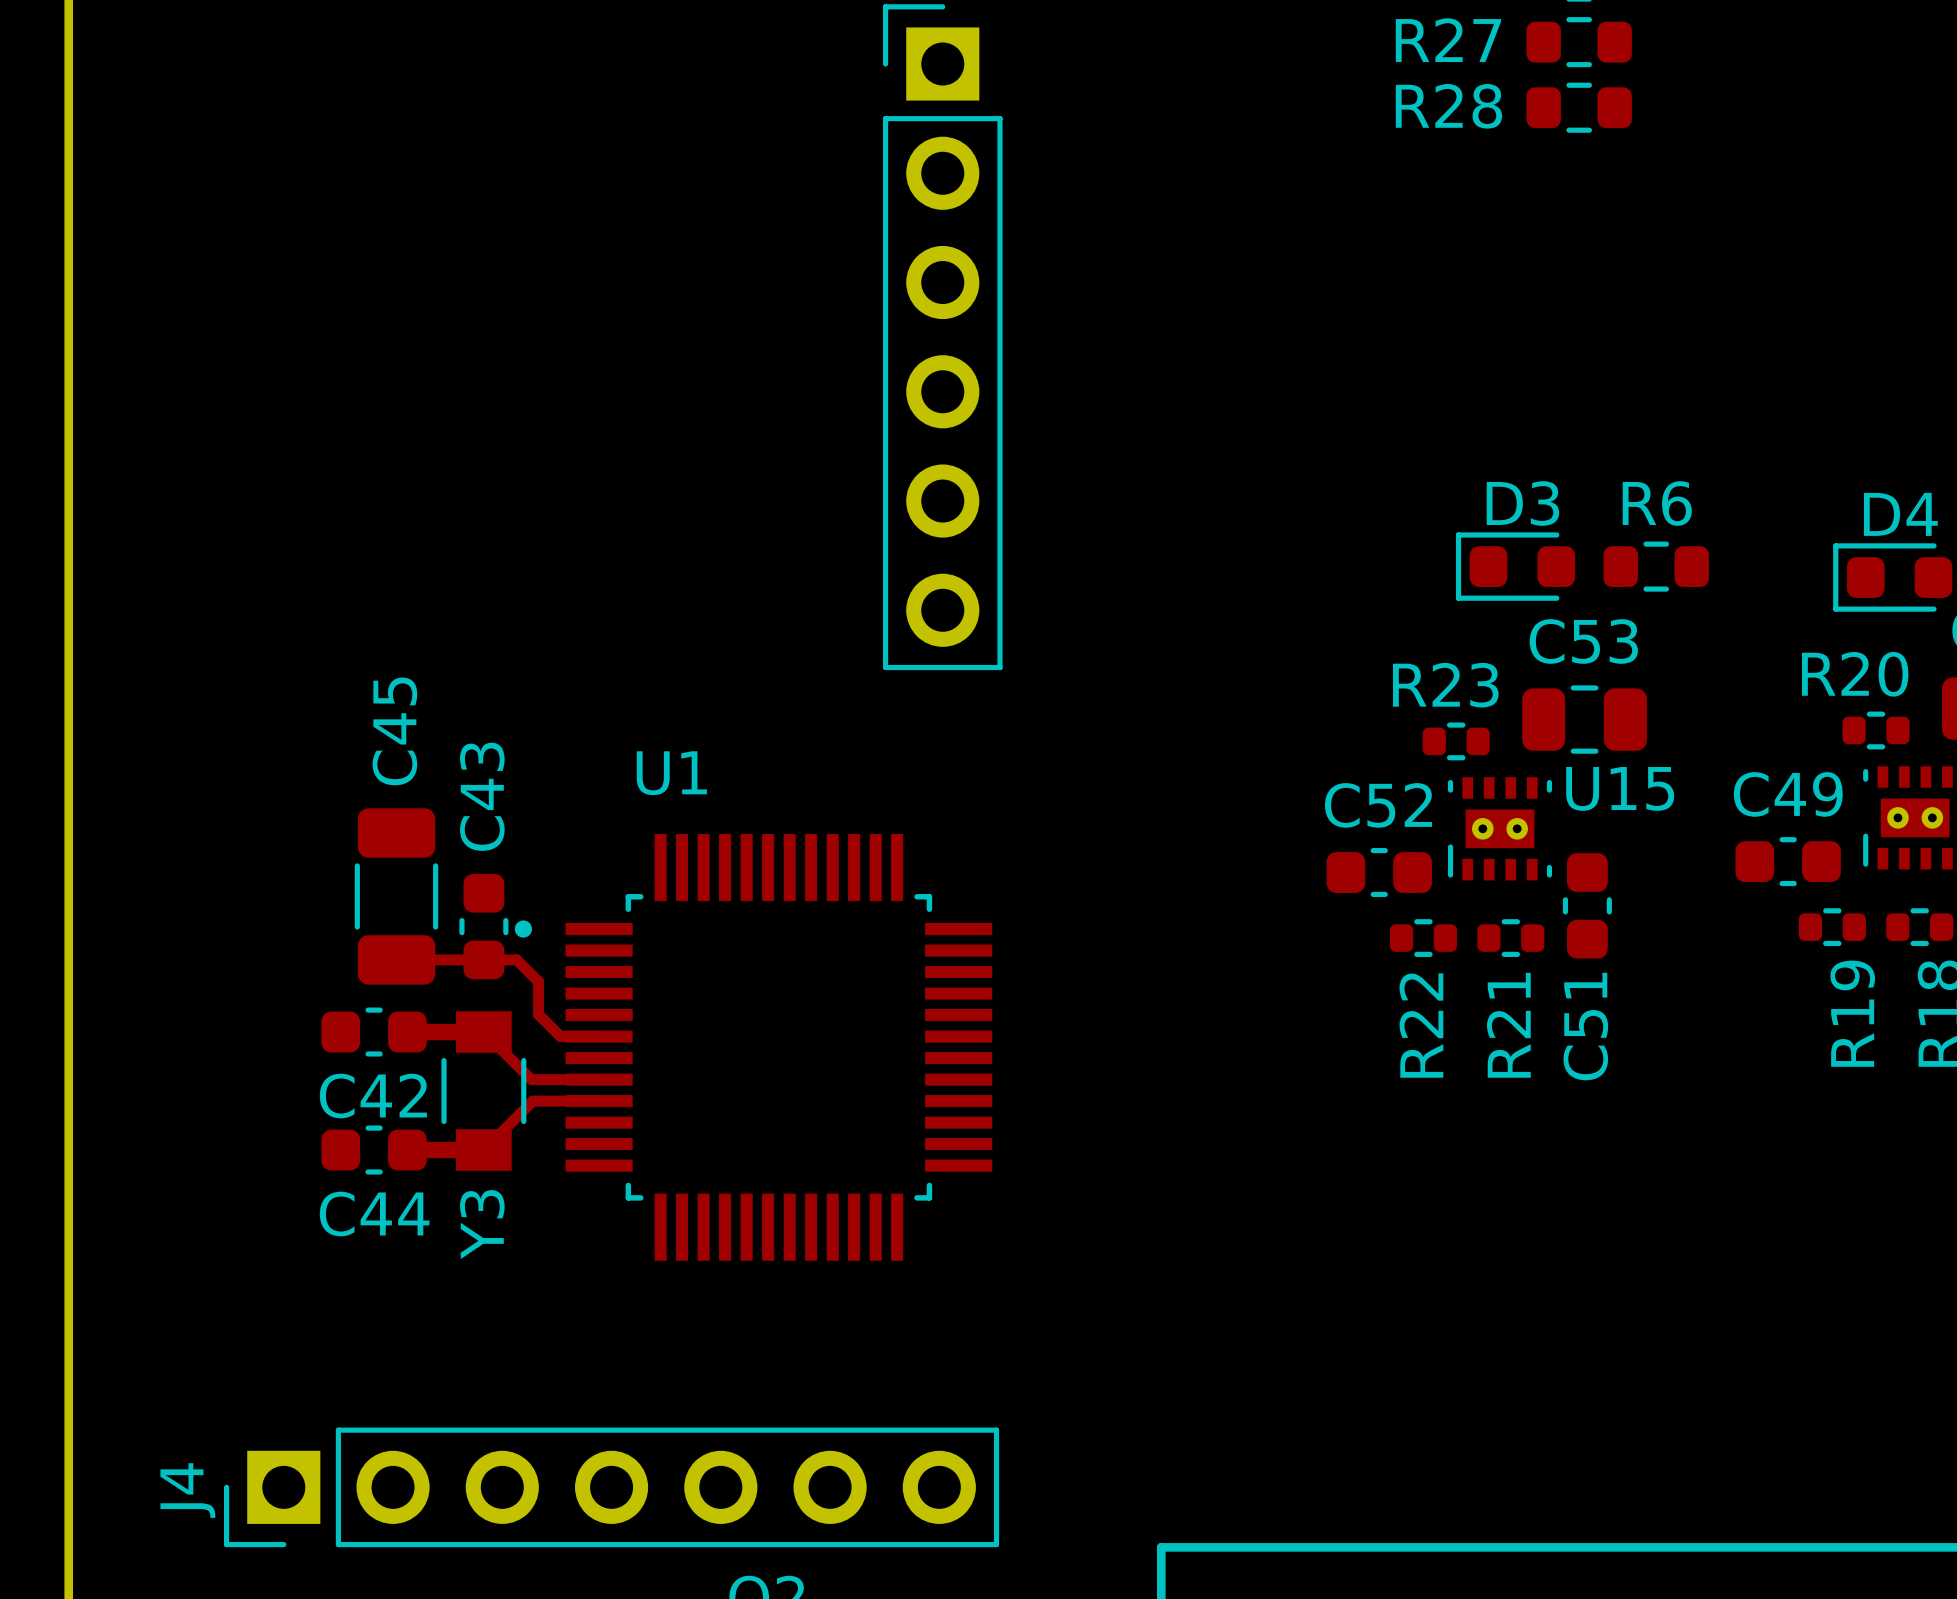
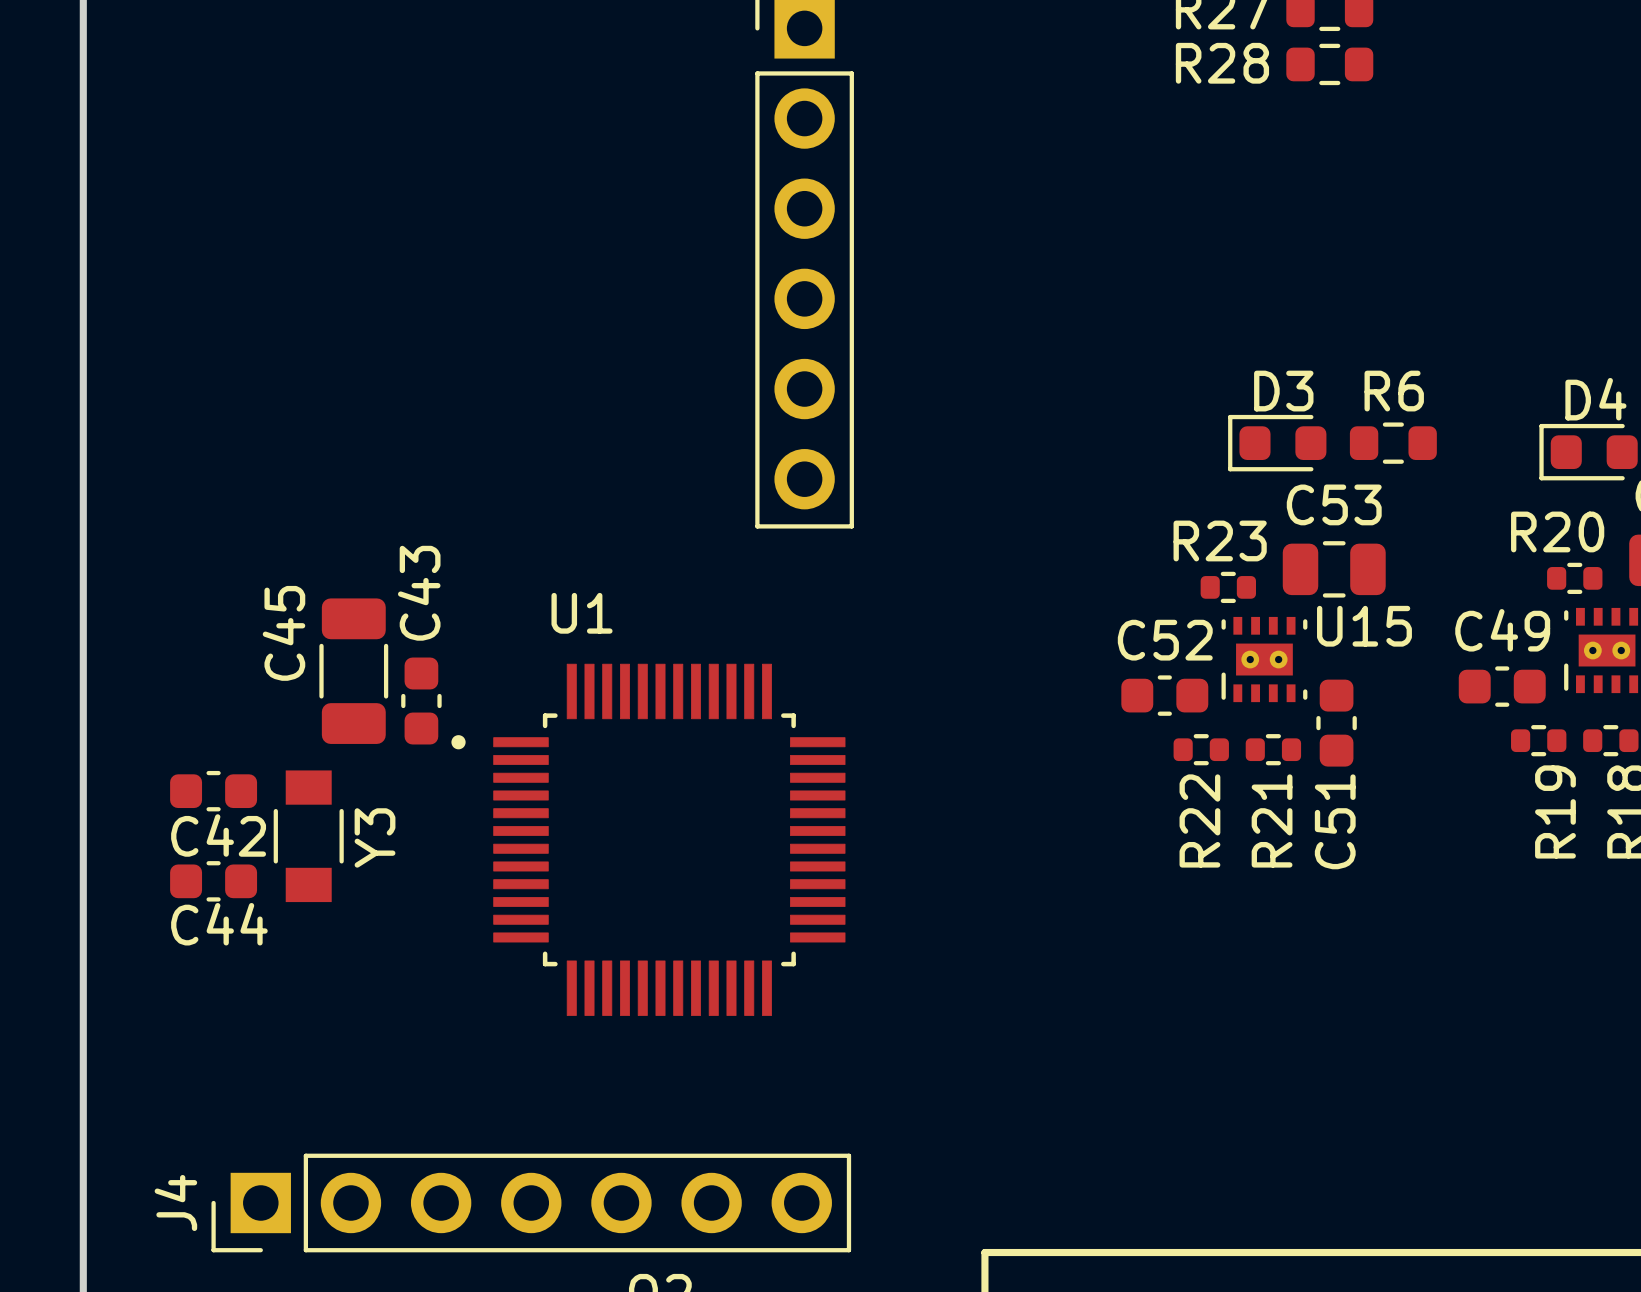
C45 name position: C45 (394, 731) -> C45 (284, 633)
C45 position: (396, 896) -> (353, 671)
C43 position: (483, 926) -> (421, 701)
top track: (396, 959) (516, 959) (538, 981) (538, 1014) (560, 1036) (599, 1036) -> none
C42 position: (374, 1032) -> (213, 791)
top track: (407, 1032) (483, 1032) (531, 1079) (599, 1079) -> none
Y3 position: (483, 1091) -> (308, 836)
C42 name position: C42 (373, 1096) -> C42 (218, 835)
top track: (599, 1101) (532, 1101) (483, 1150) (407, 1150) -> none
C44 position: (374, 1150) -> (213, 881)
C44 name position: C44 (374, 1214) -> C44 (219, 924)
Y3 name position: Y3 (482, 1224) -> Y3 (375, 837)

